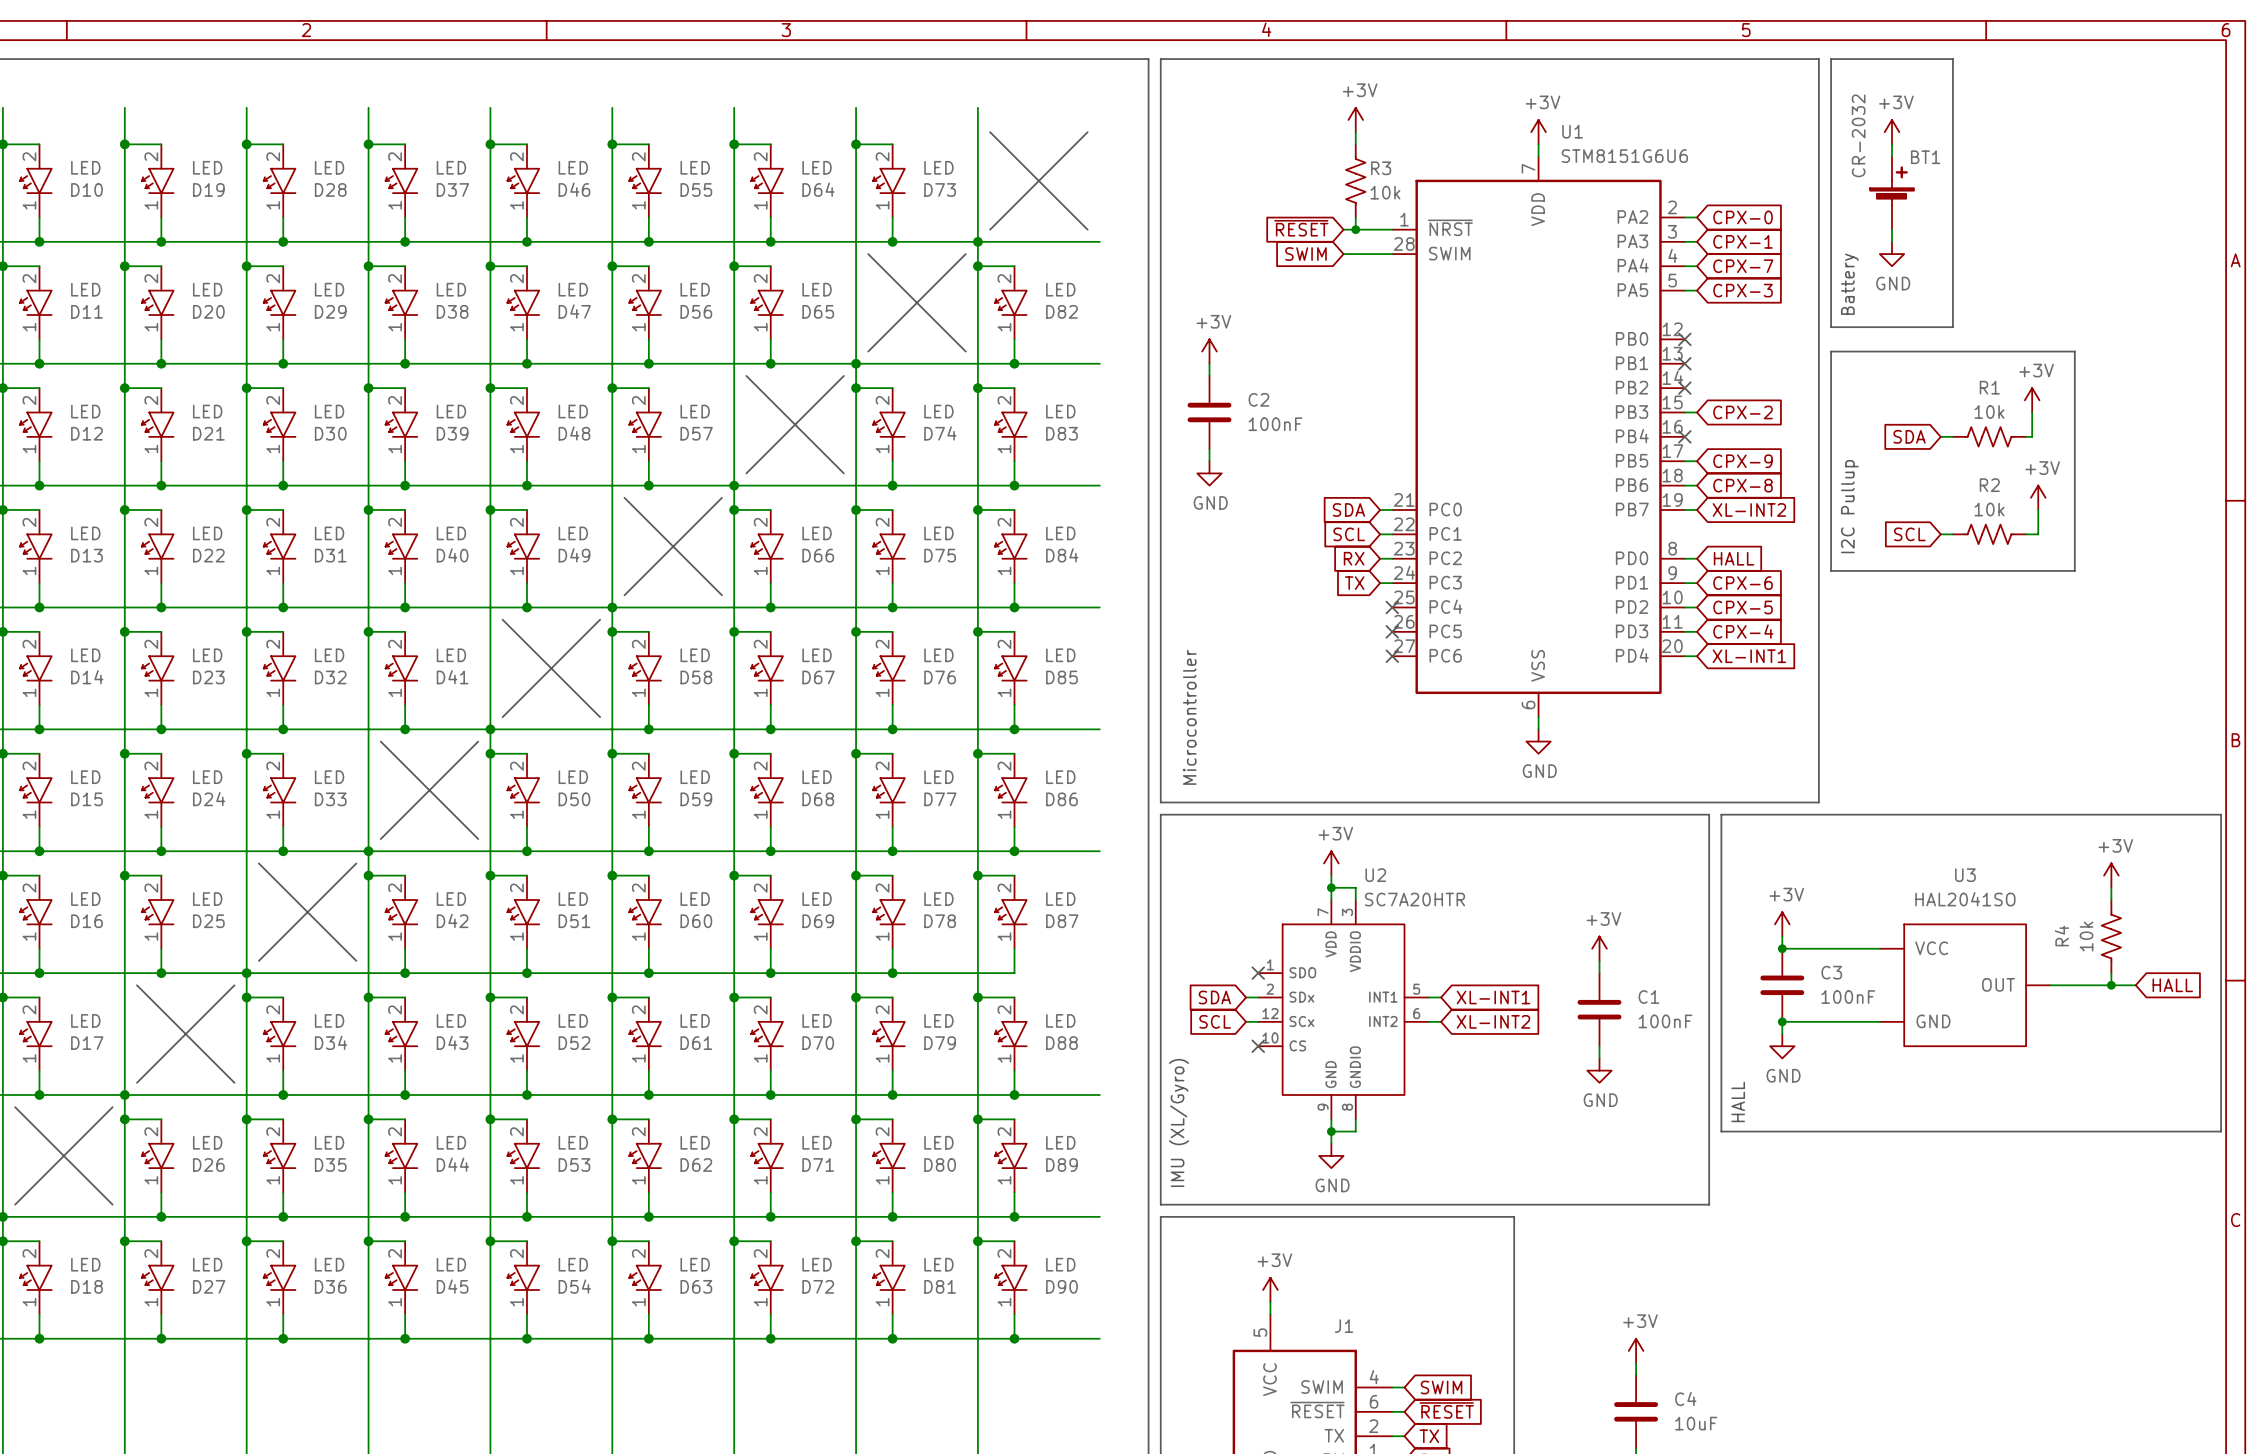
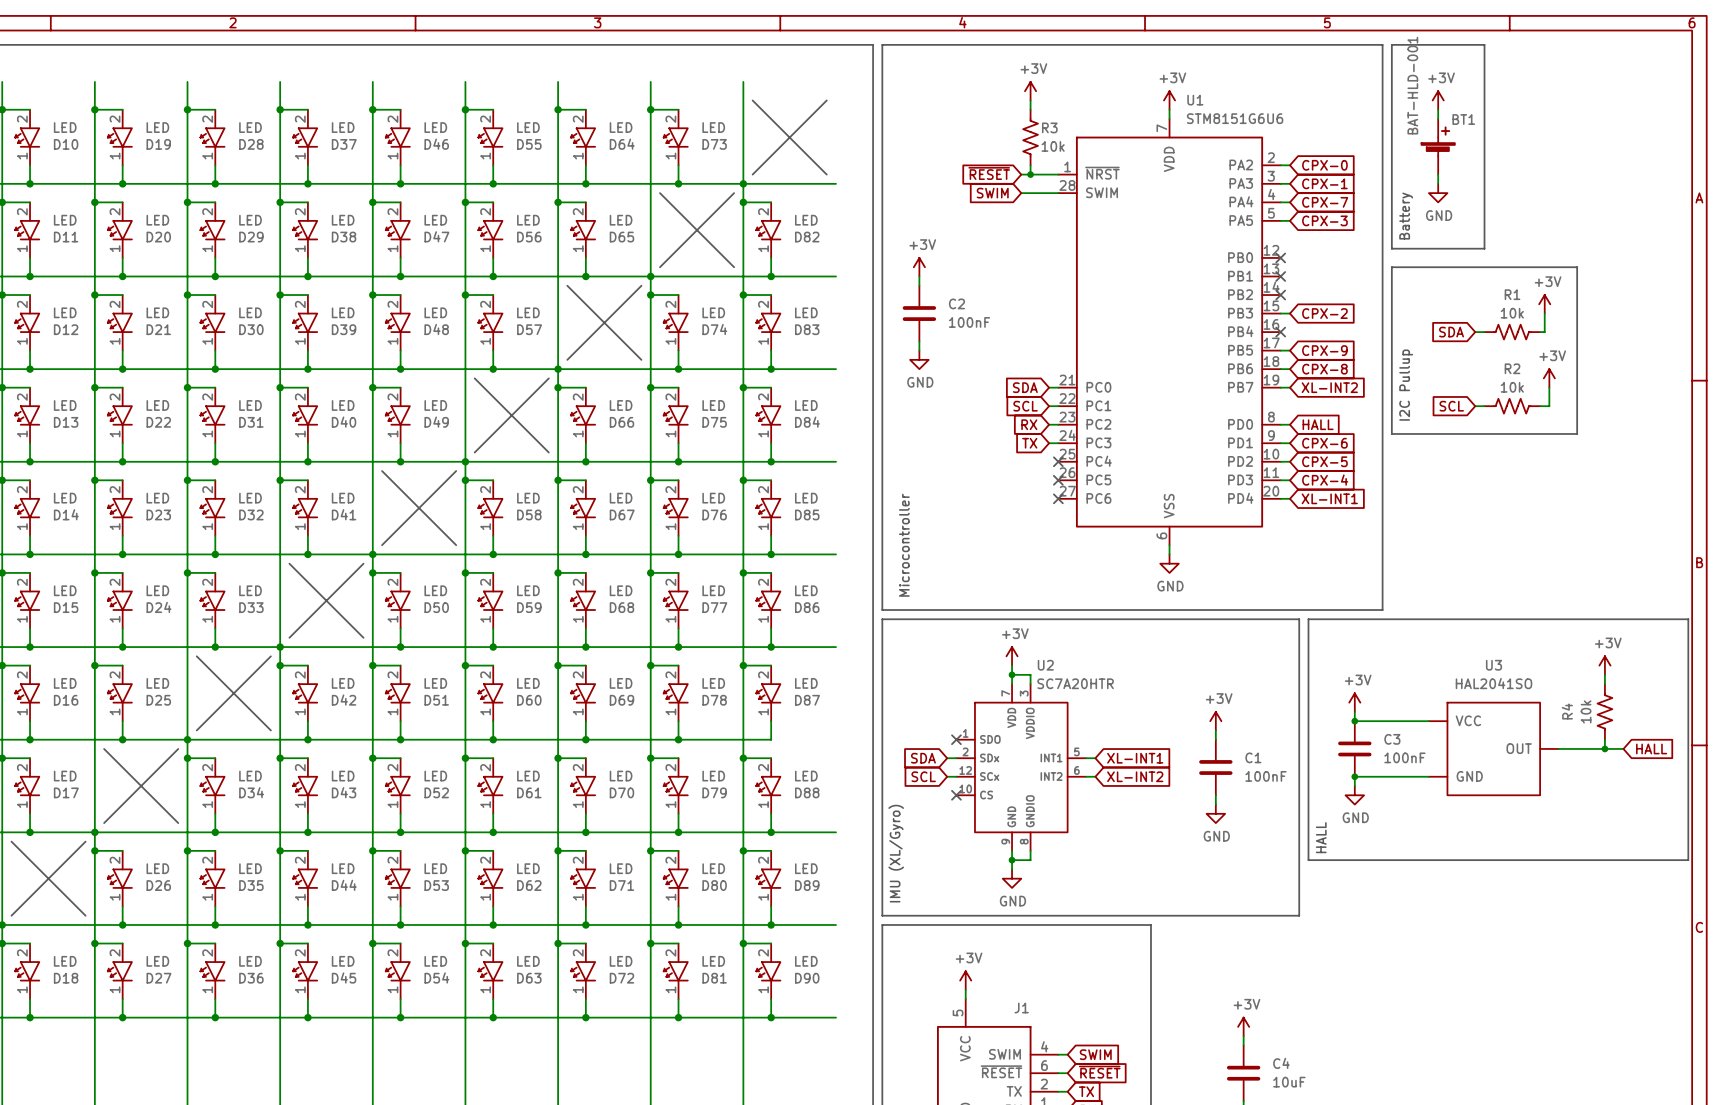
BT1 value: CR-2032 (1858, 135) -> BAT-HLD-001 (1412, 85)

